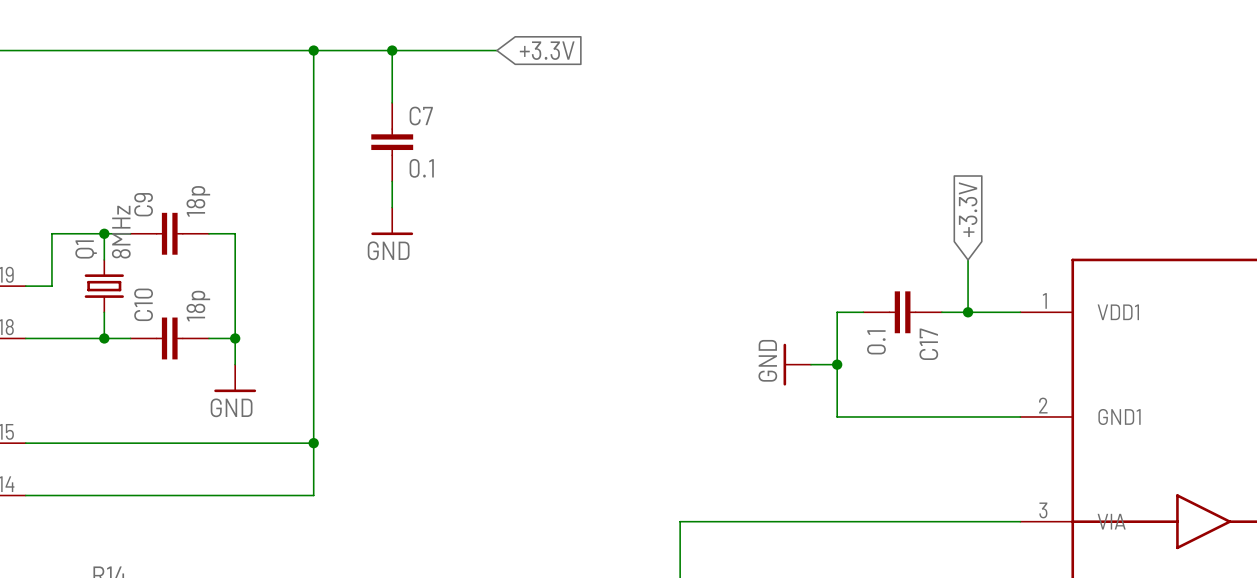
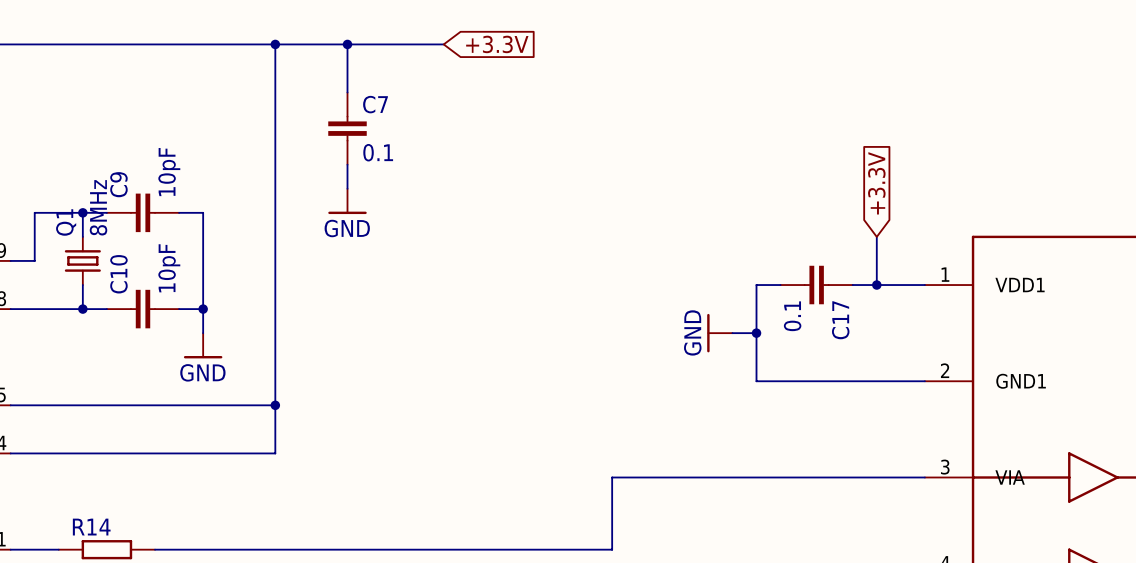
C9 value: 18p (198, 201) -> 10pF (169, 172)
C10 value: 18p (198, 306) -> 10pF (169, 268)

